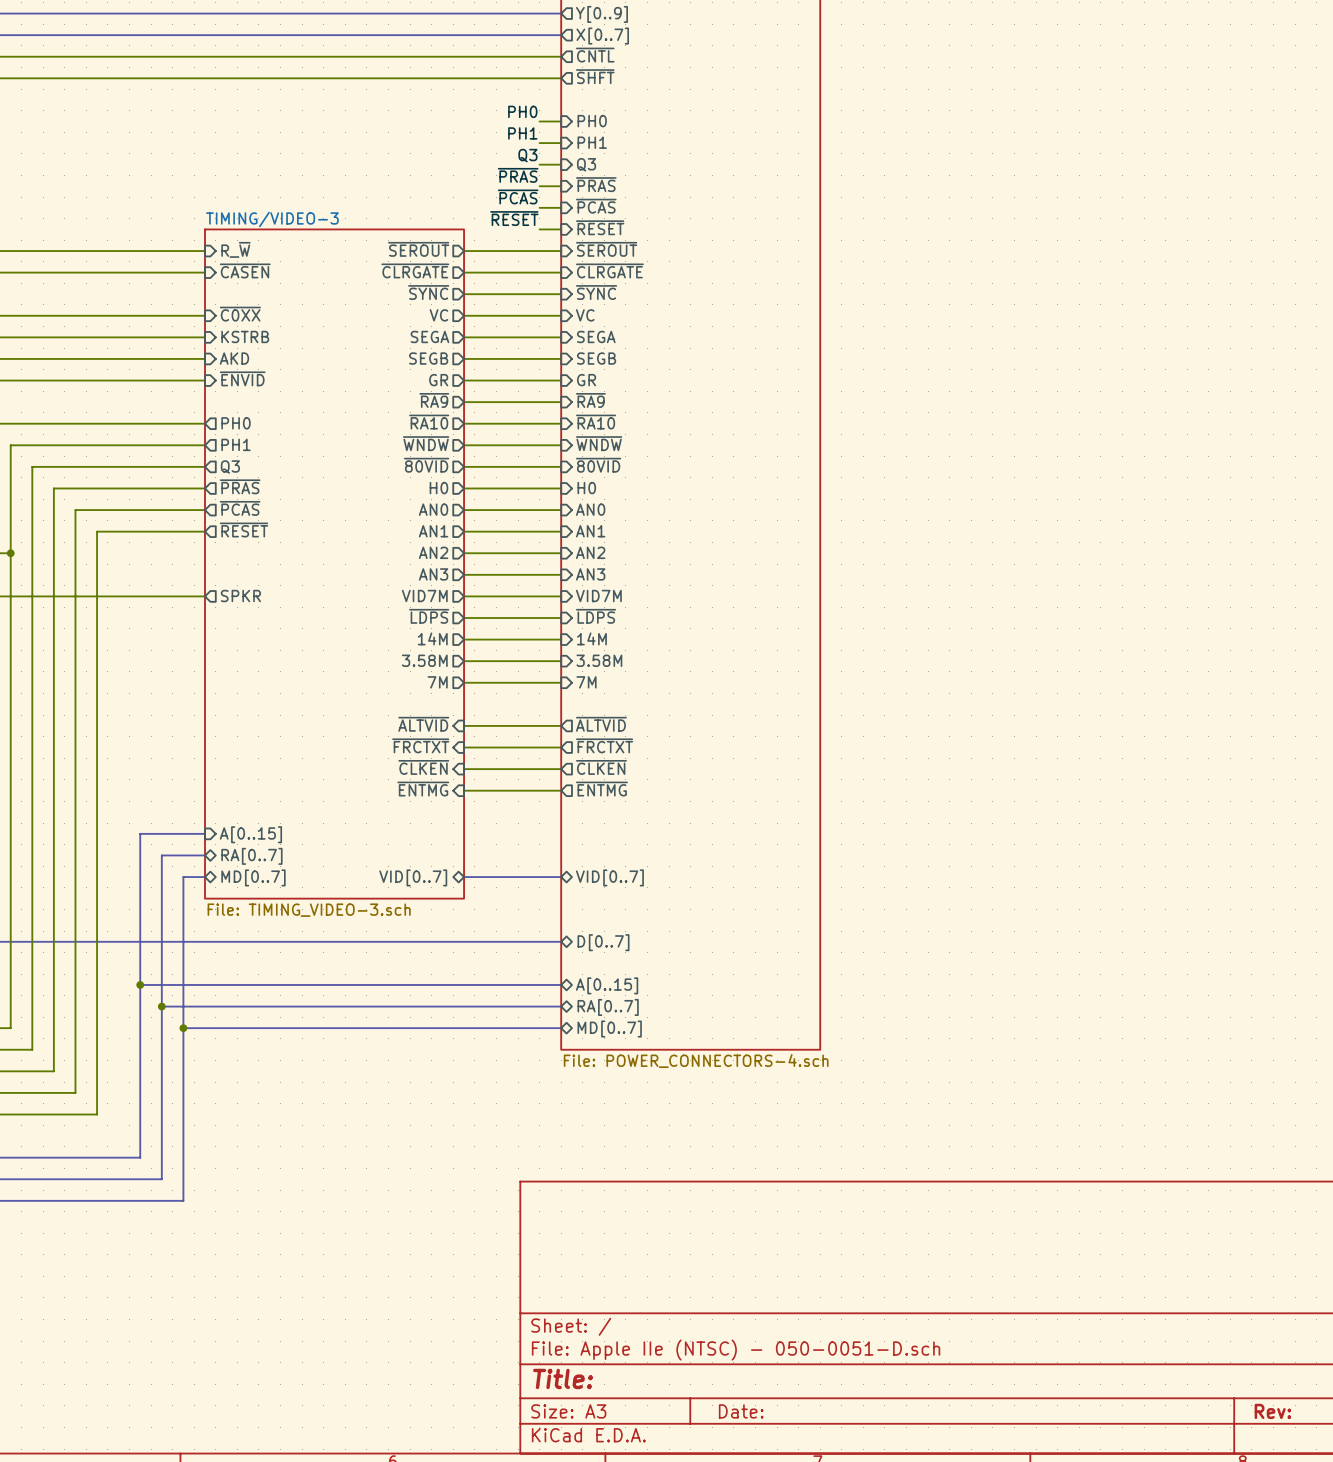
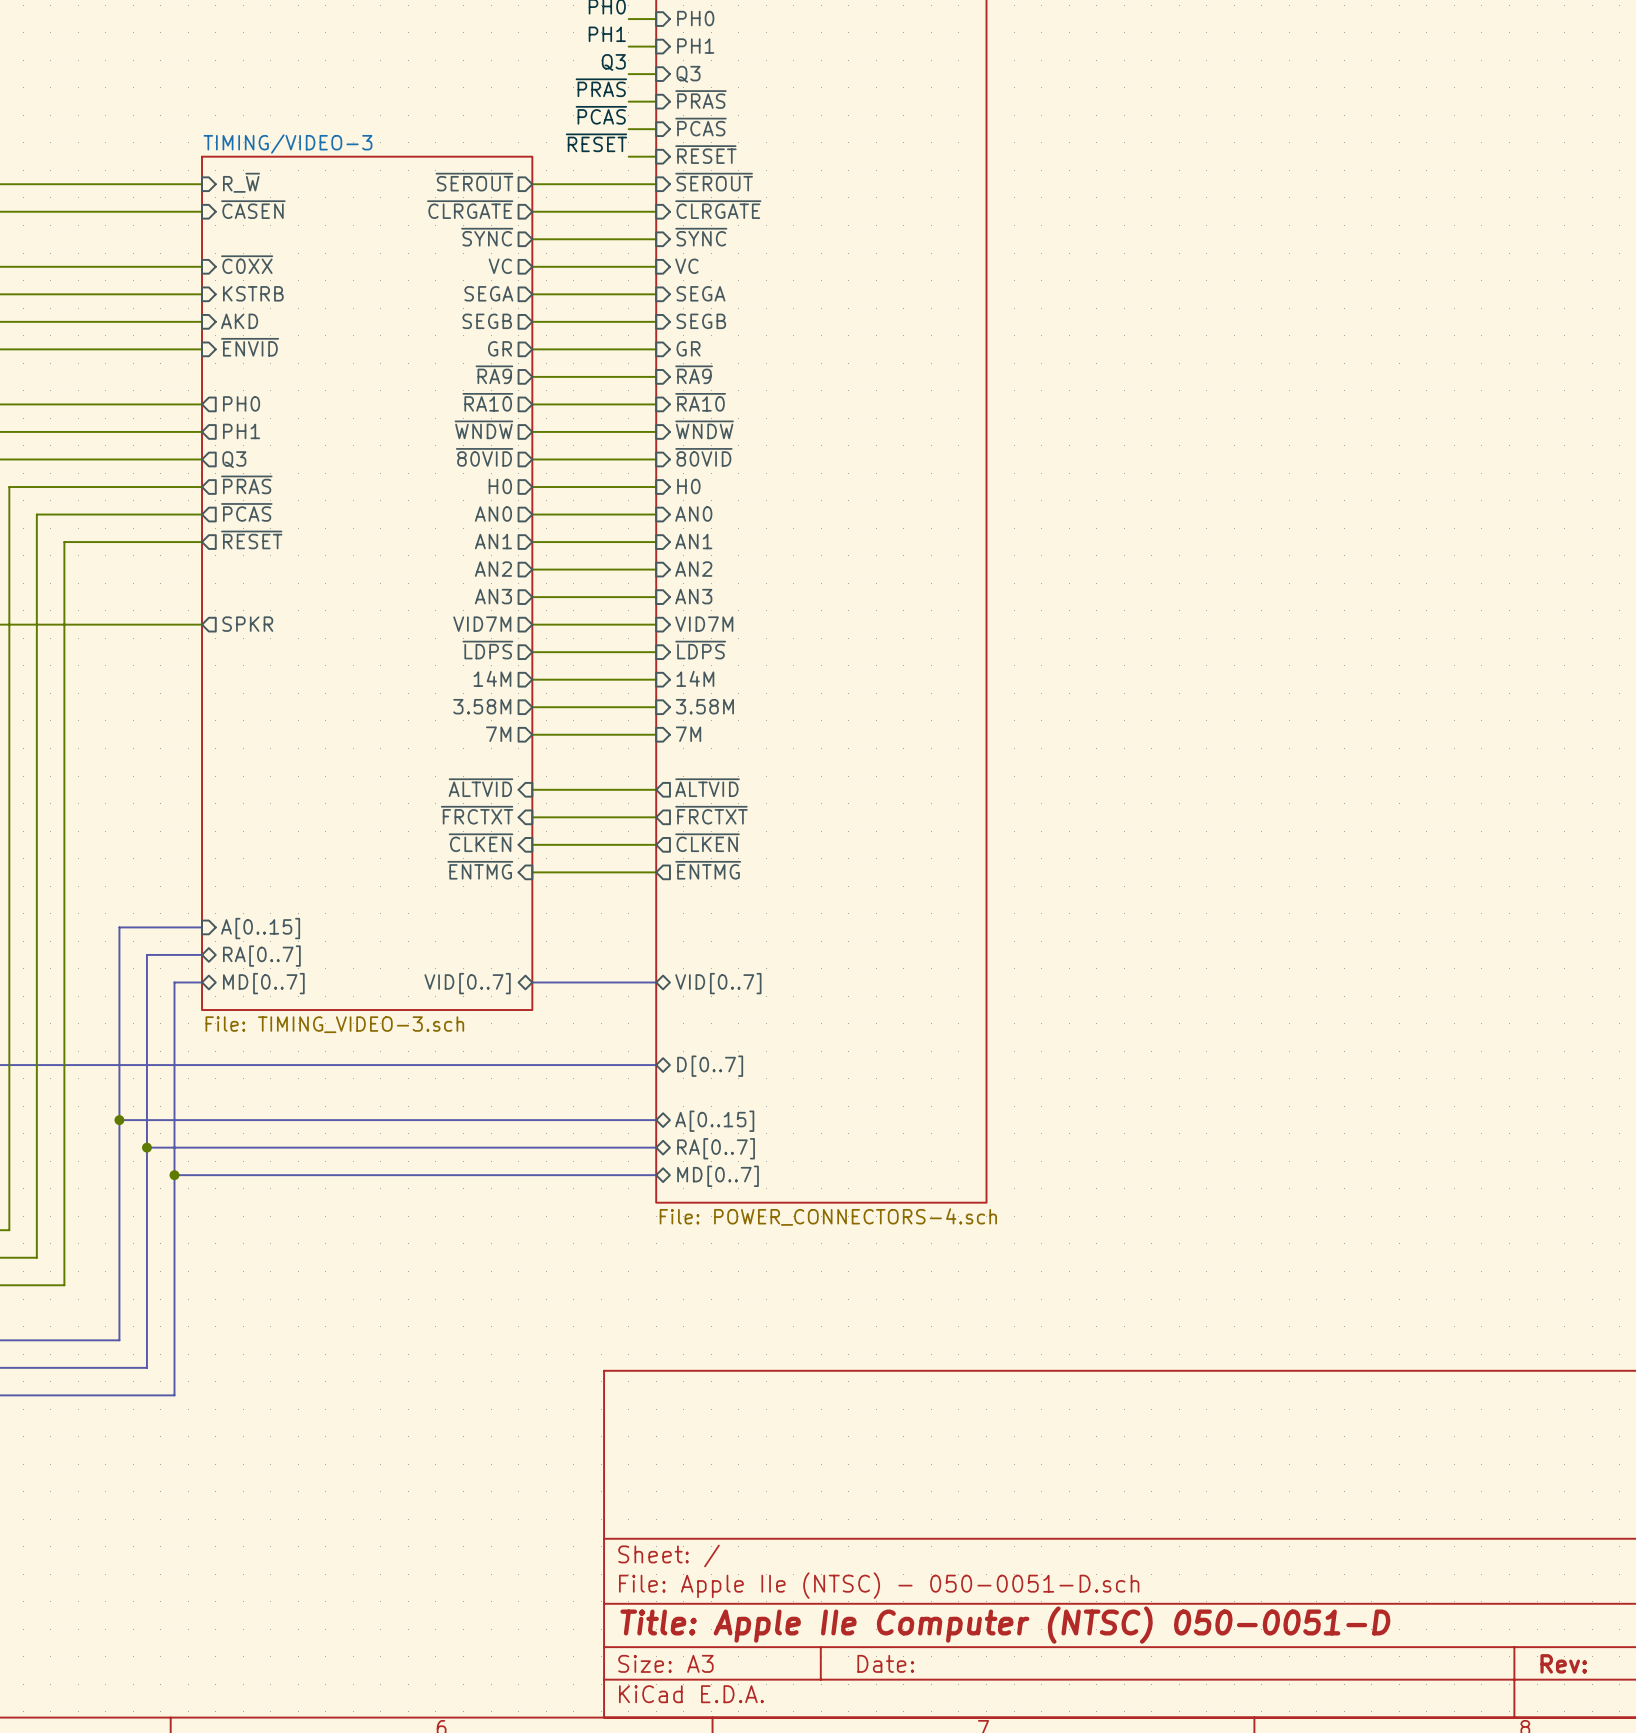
title block: Title: (563, 1378) -> Title: Apple IIe Computer (NTSC) 050-0051-D (1005, 1625)

